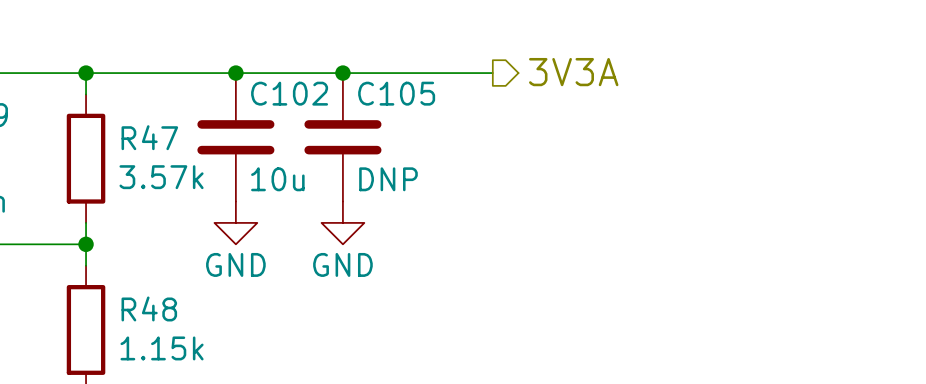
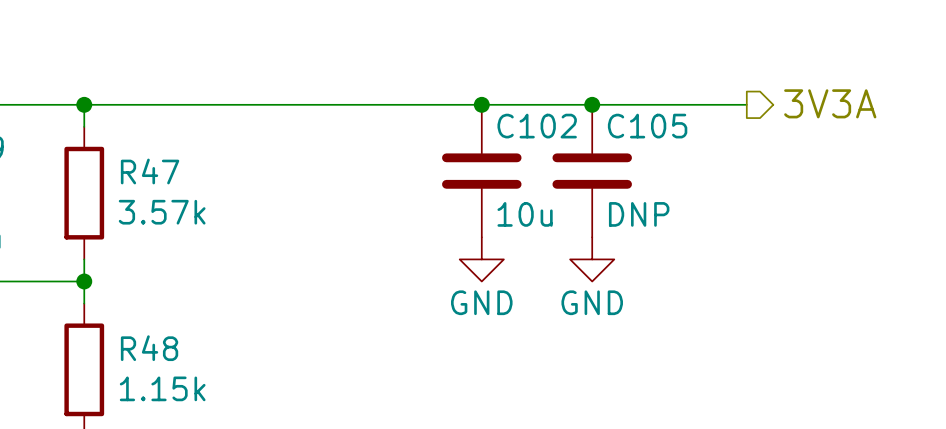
hierarchical label position: 3V3A (573, 72) -> 3V3A (830, 103)
junction: (235, 73) -> none
junction: (342, 73) -> none
junction: none -> (481, 104)
wire: none -> (503, 104) (746, 104)
junction: none -> (592, 104)
C102 position: (235, 137) -> (481, 171)
C105 position: (342, 137) -> (592, 171)
power symbol: GND (235, 222) -> none
power symbol: GND (342, 222) -> none
power symbol: none -> GND (481, 259)
power symbol: none -> GND (592, 259)

